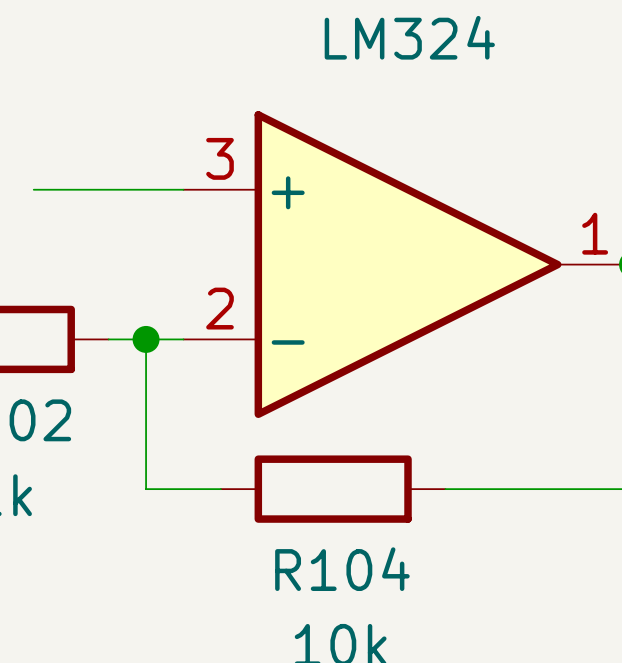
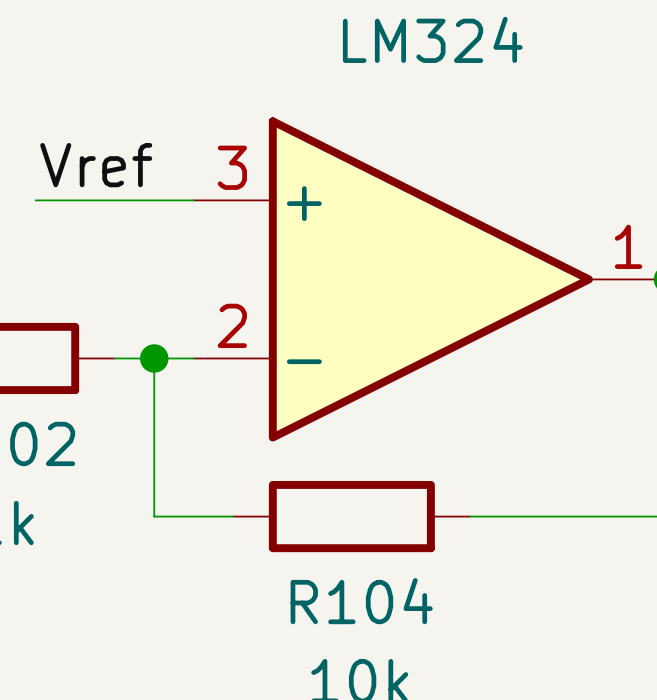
label: none -> Vref (96, 165)

